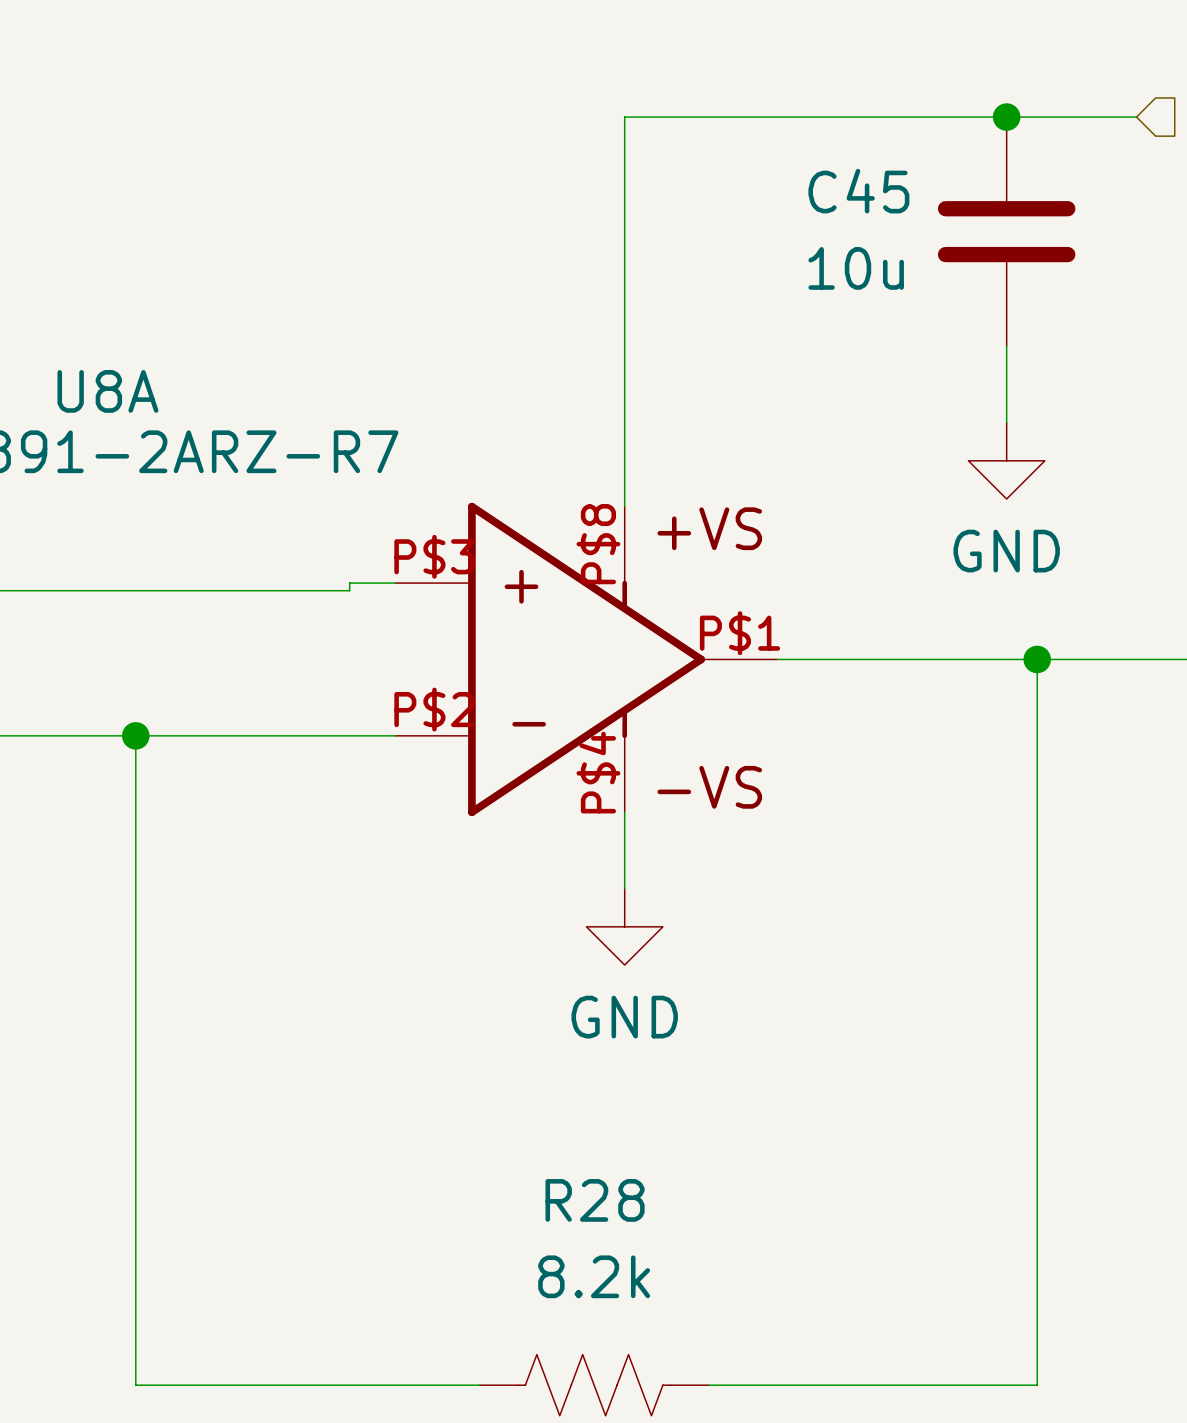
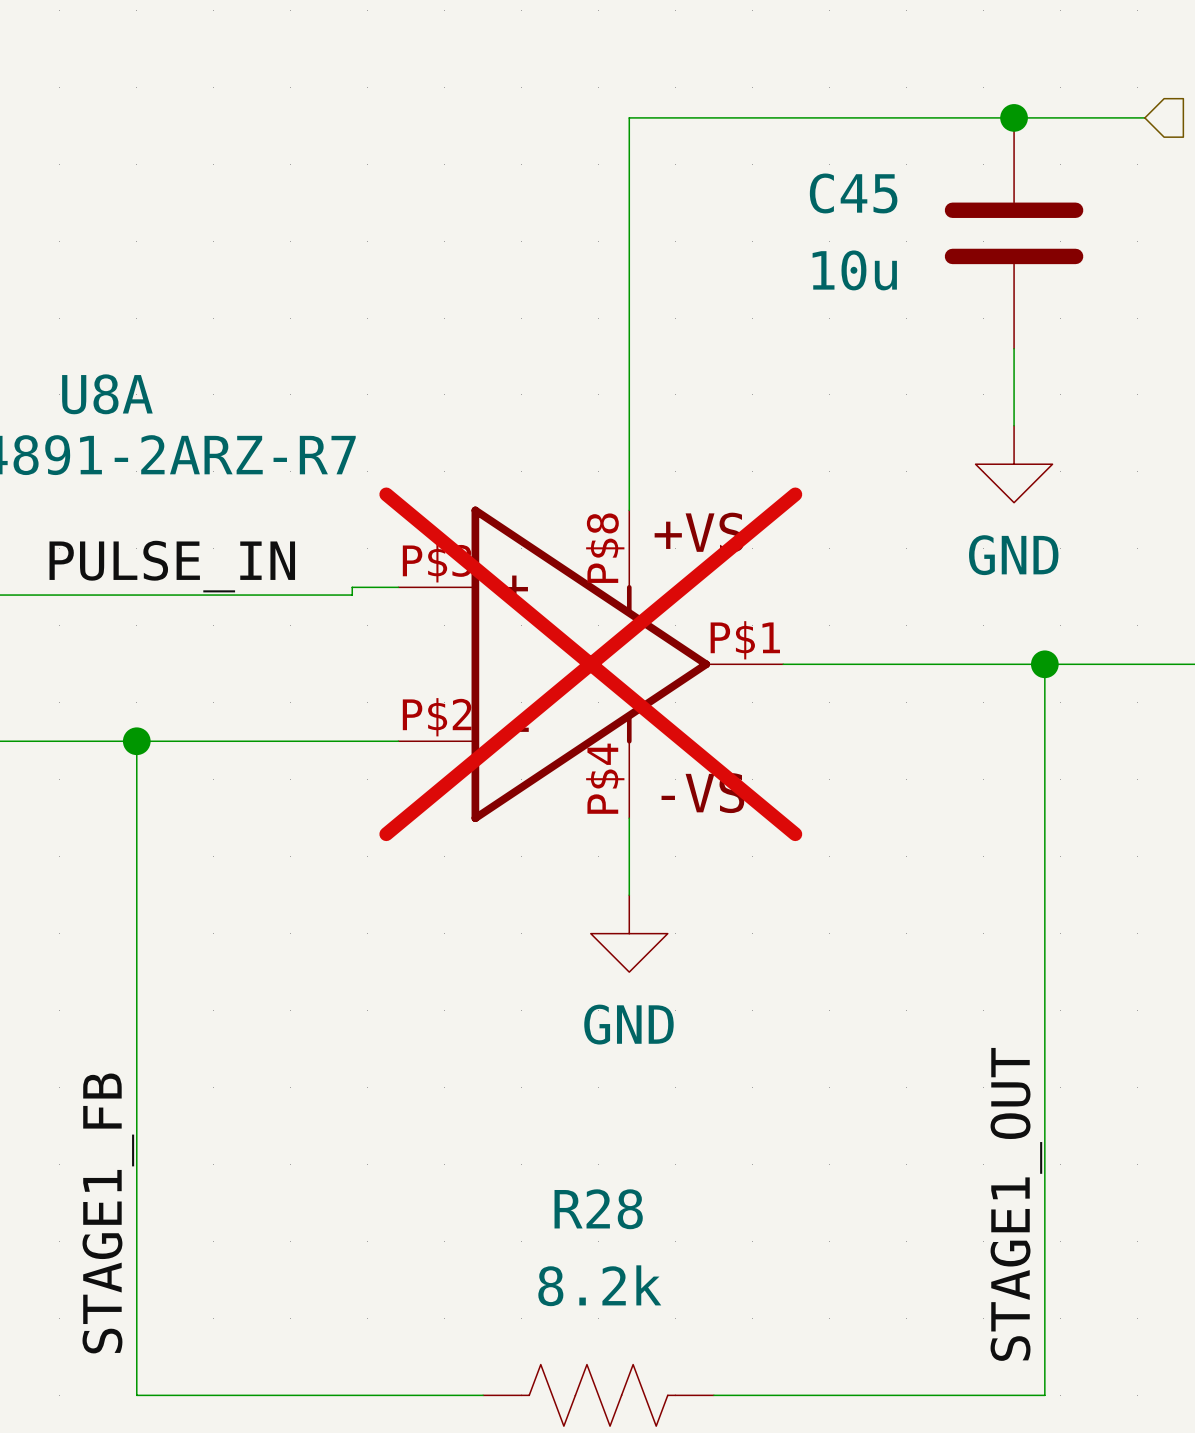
label: none -> PULSE_IN (172, 566)
U8A do-not-place cross: none -> (590, 664)
label: none -> STAGE1_OUT (1016, 1204)
label: none -> STAGE1_FB (108, 1213)

